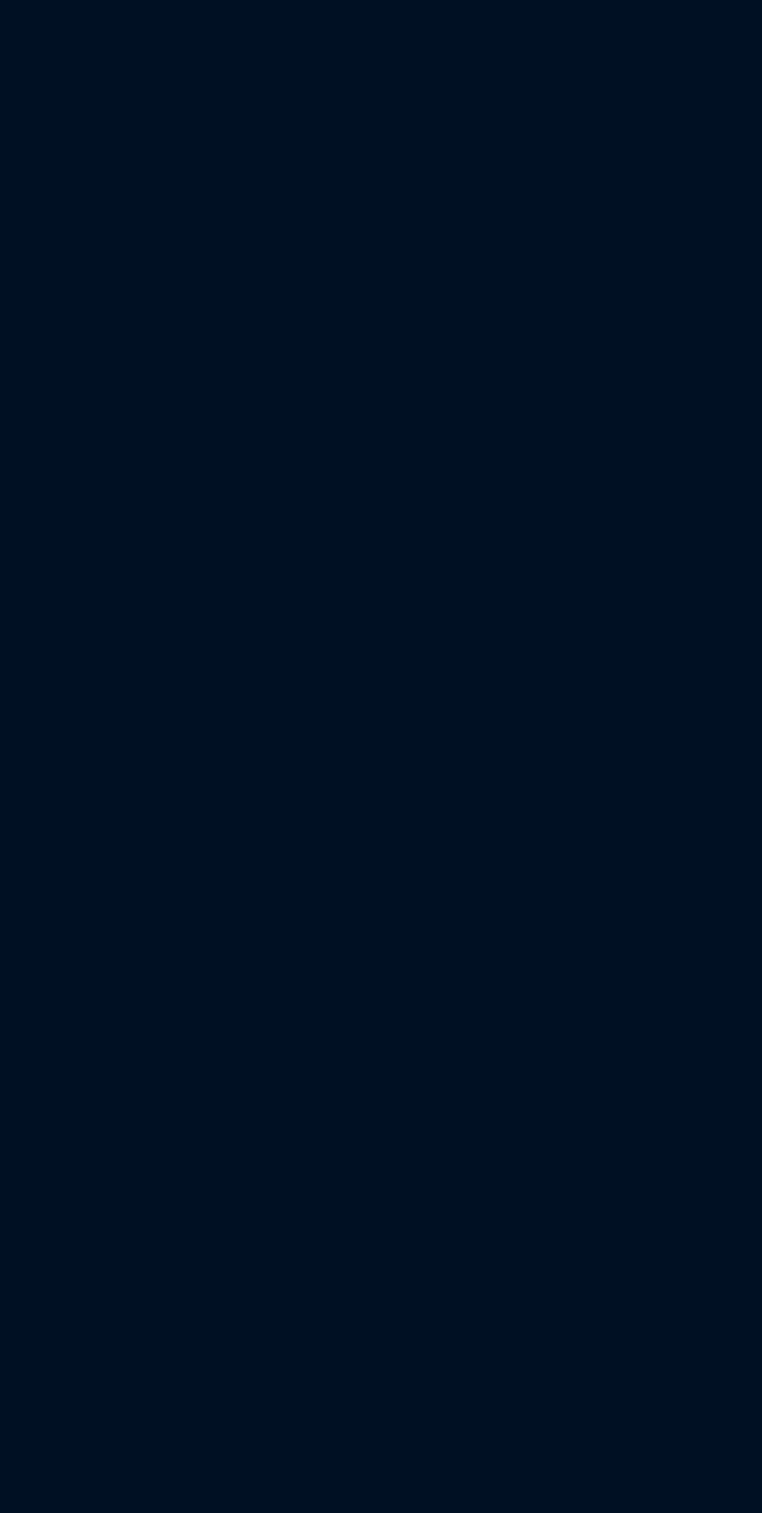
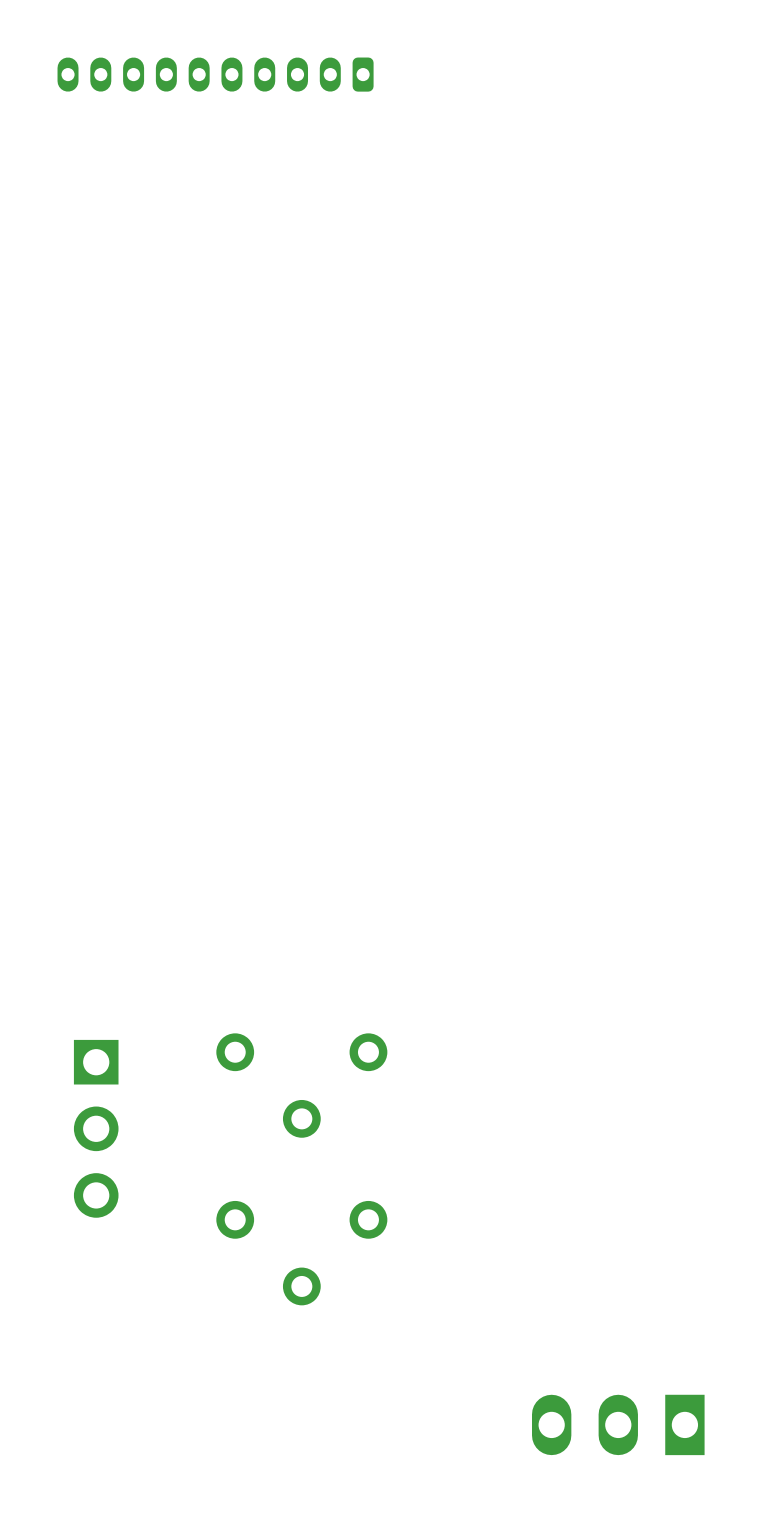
part: none -> (215, 74)
part: none -> (301, 1085)
part: none -> (96, 1128)
part: none -> (301, 1253)
part: none -> (618, 1424)

